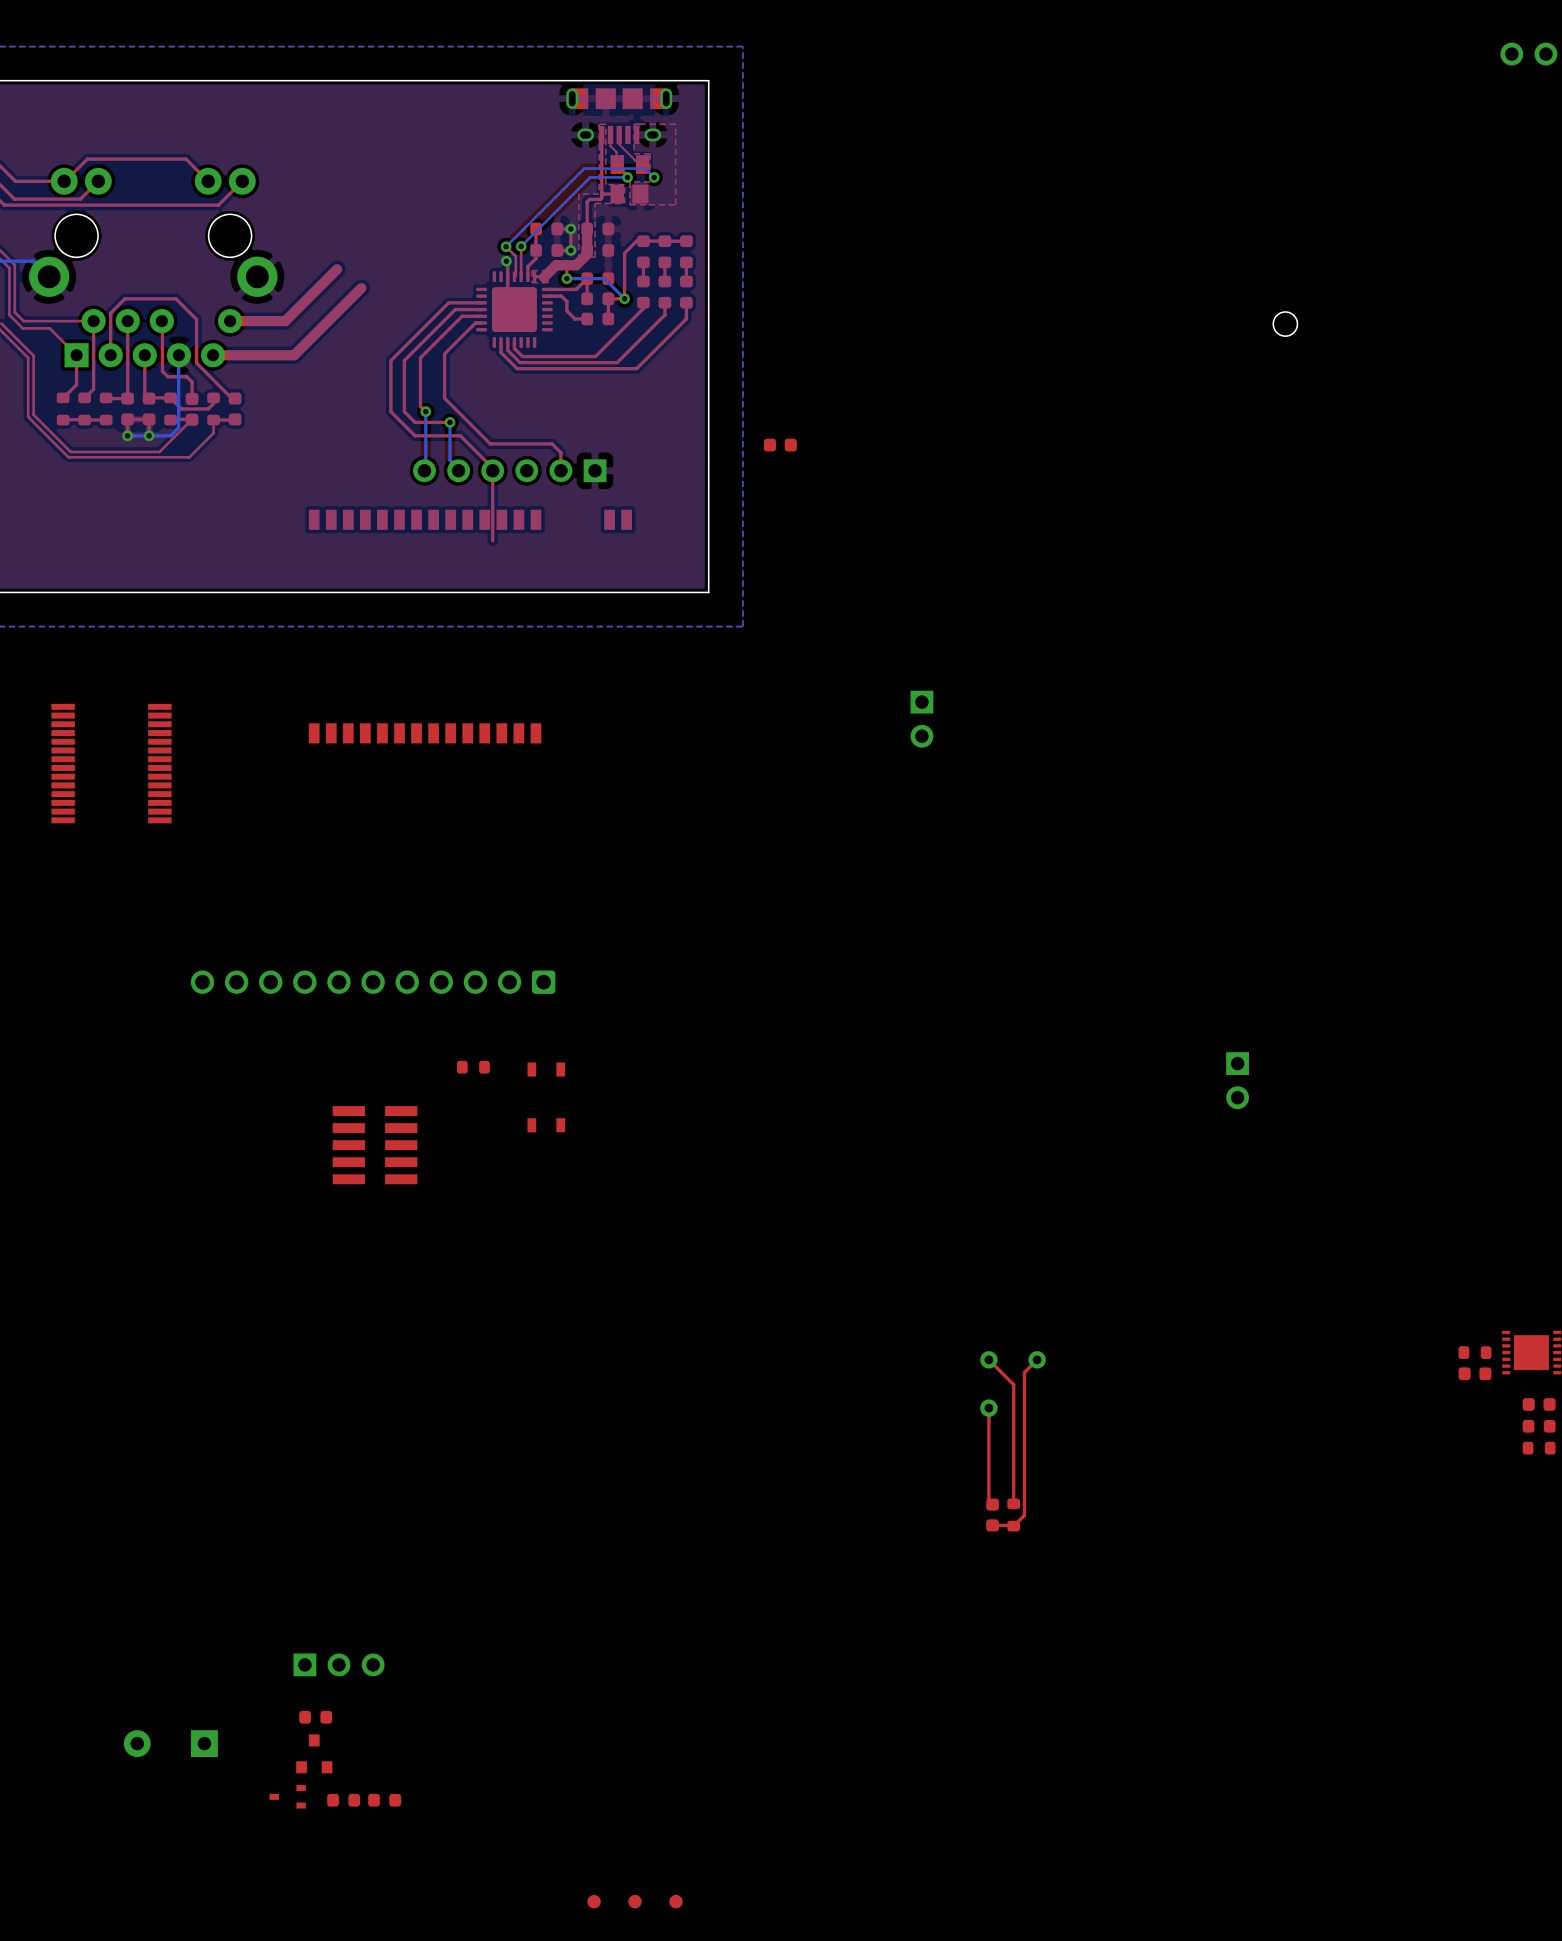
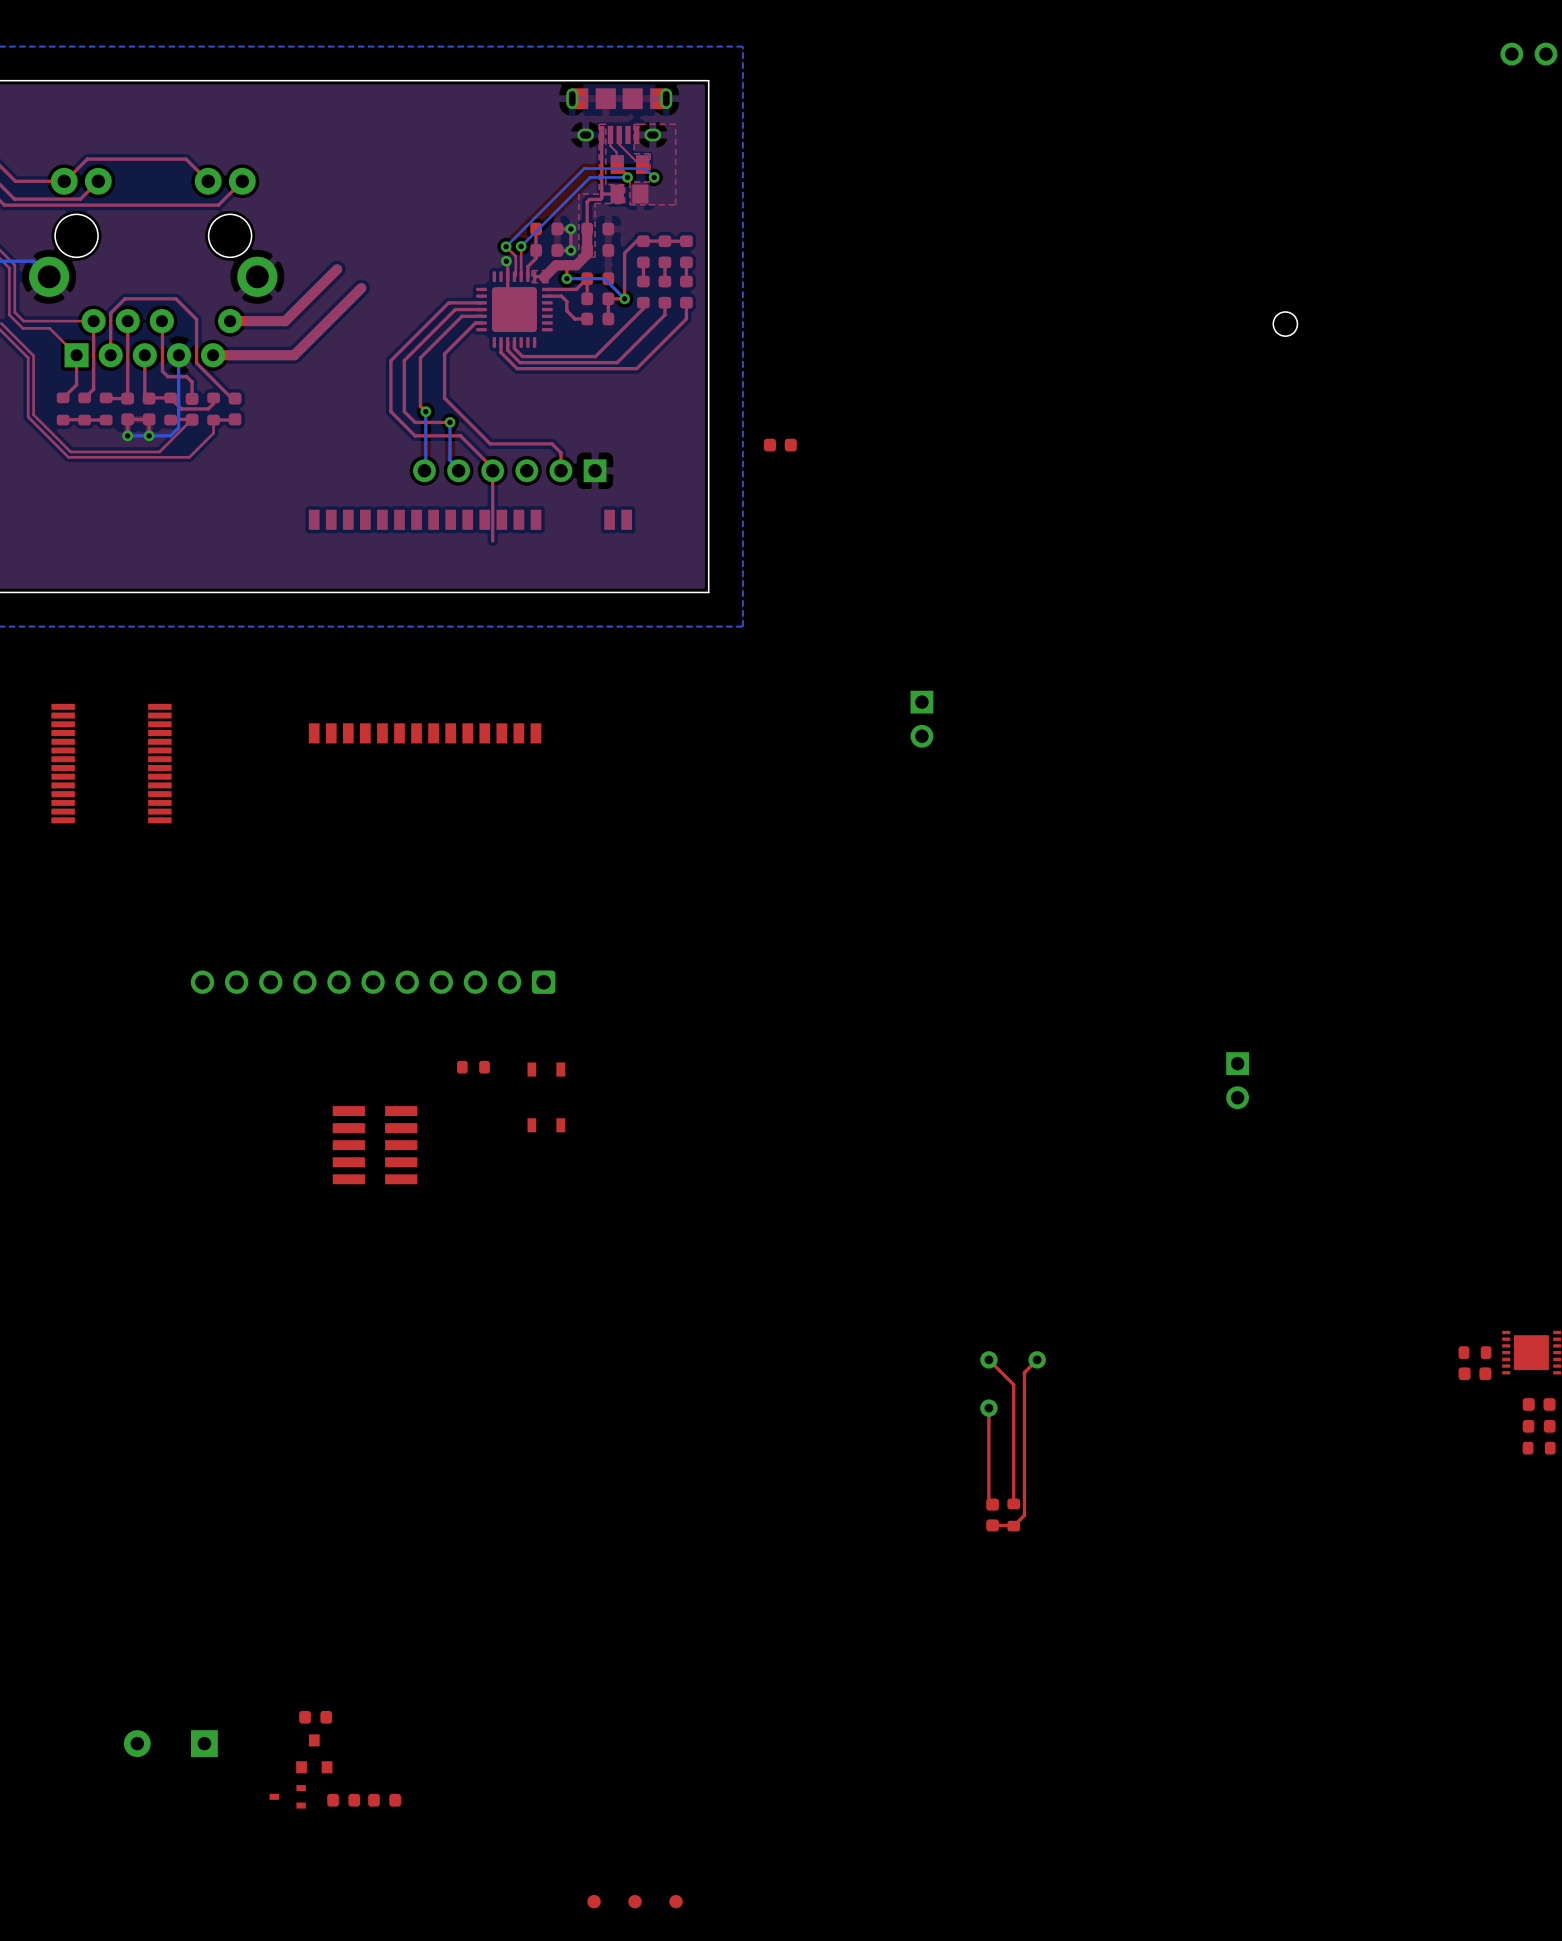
part: (339, 1664) -> none

